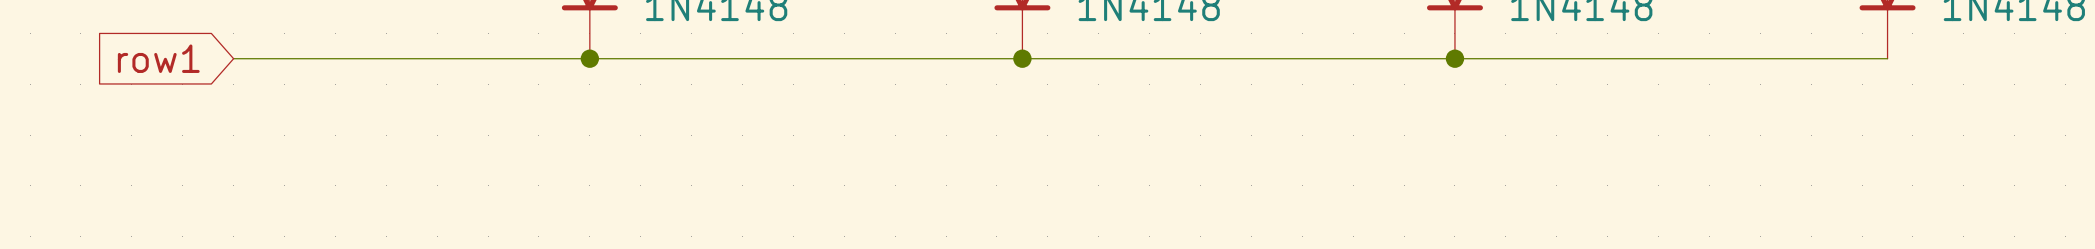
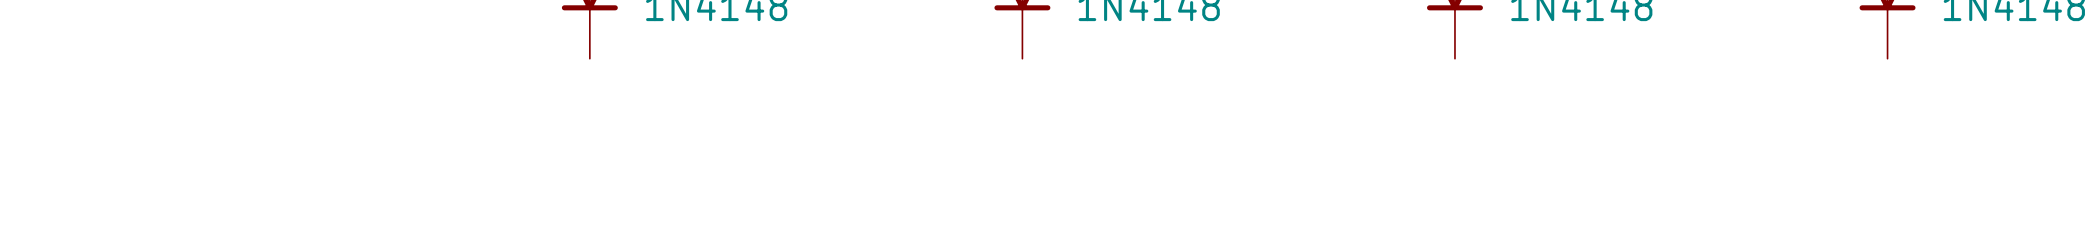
global label: row1 (158, 58) -> none
wire: (233, 58) (1887, 58) -> none
junction: (589, 58) -> none
junction: (1022, 58) -> none
junction: (1454, 58) -> none

